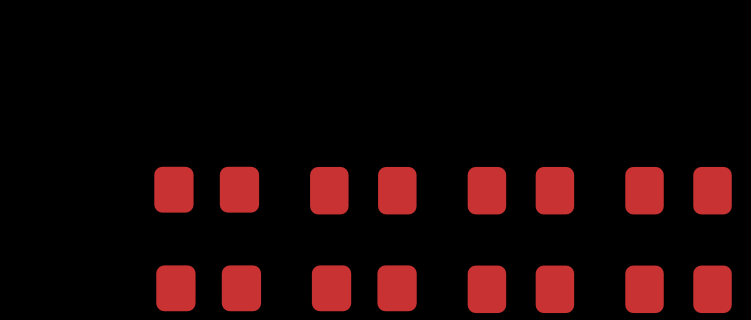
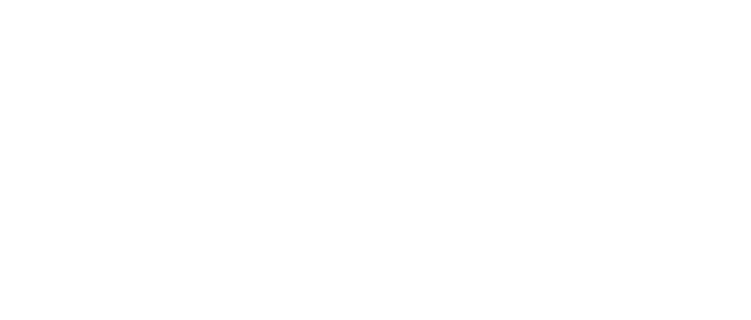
part: (206, 189) -> none
part: (363, 190) -> none
part: (520, 190) -> none
part: (678, 190) -> none
part: (208, 288) -> none
part: (364, 288) -> none
part: (520, 289) -> none
part: (678, 289) -> none

